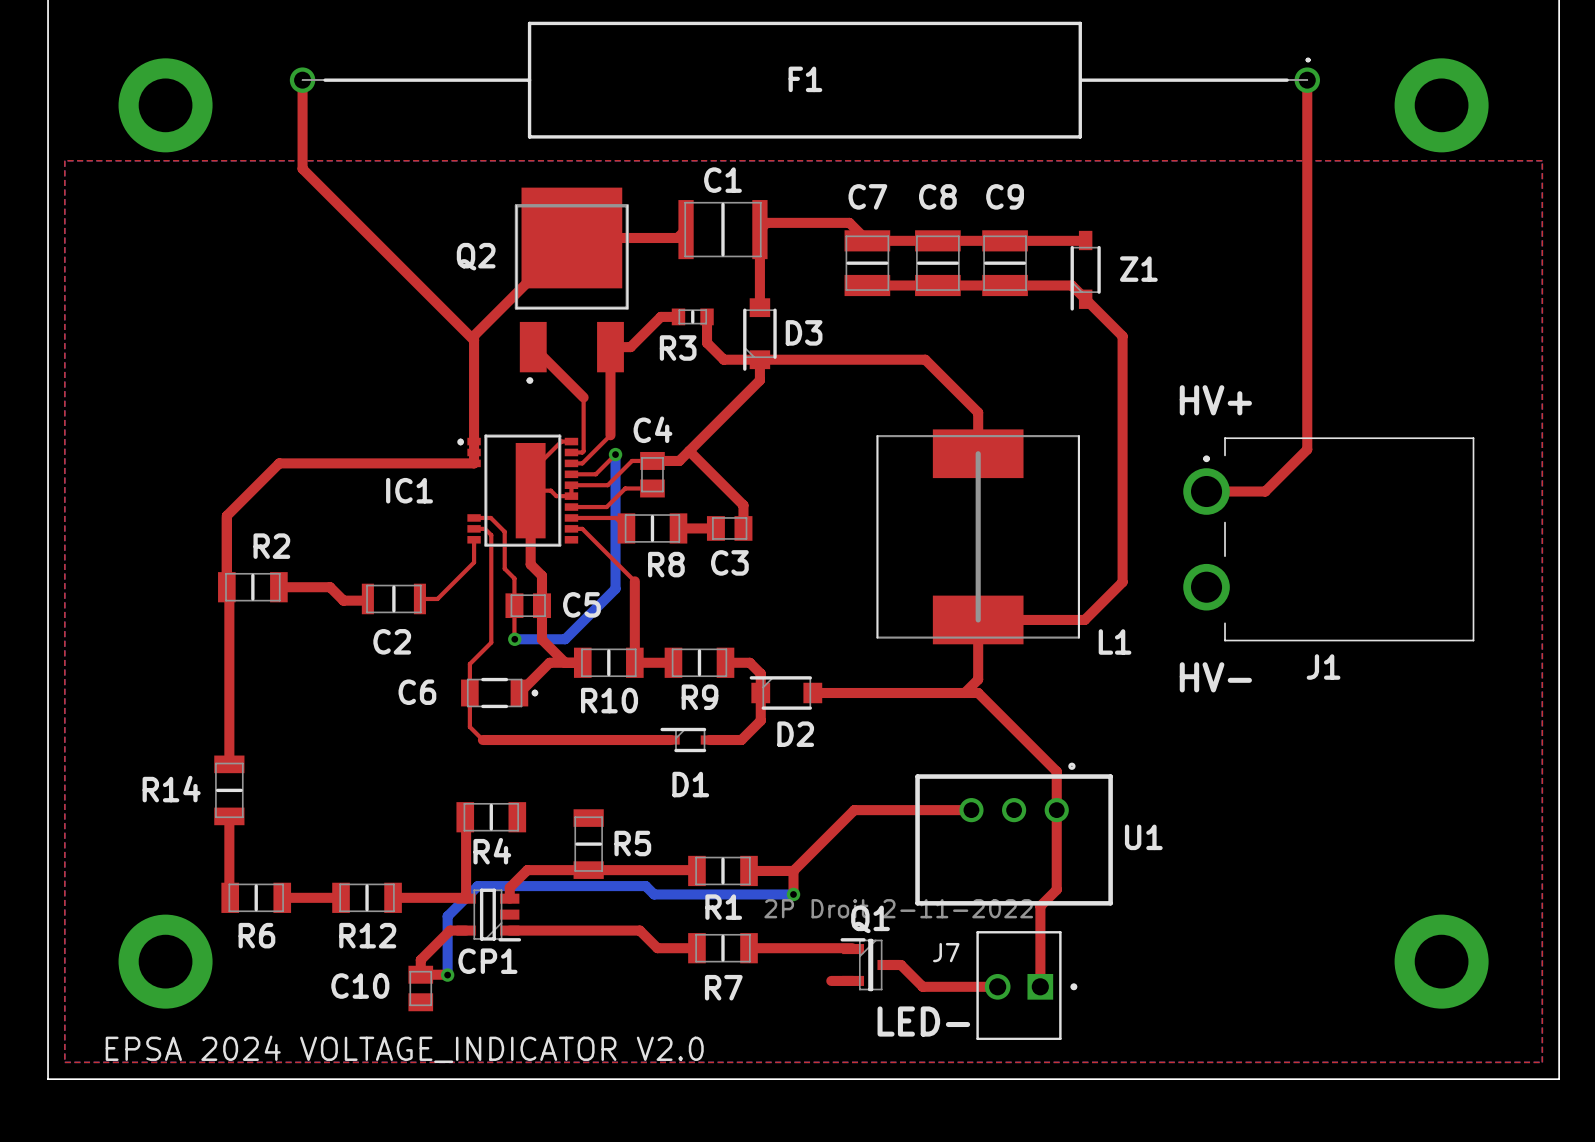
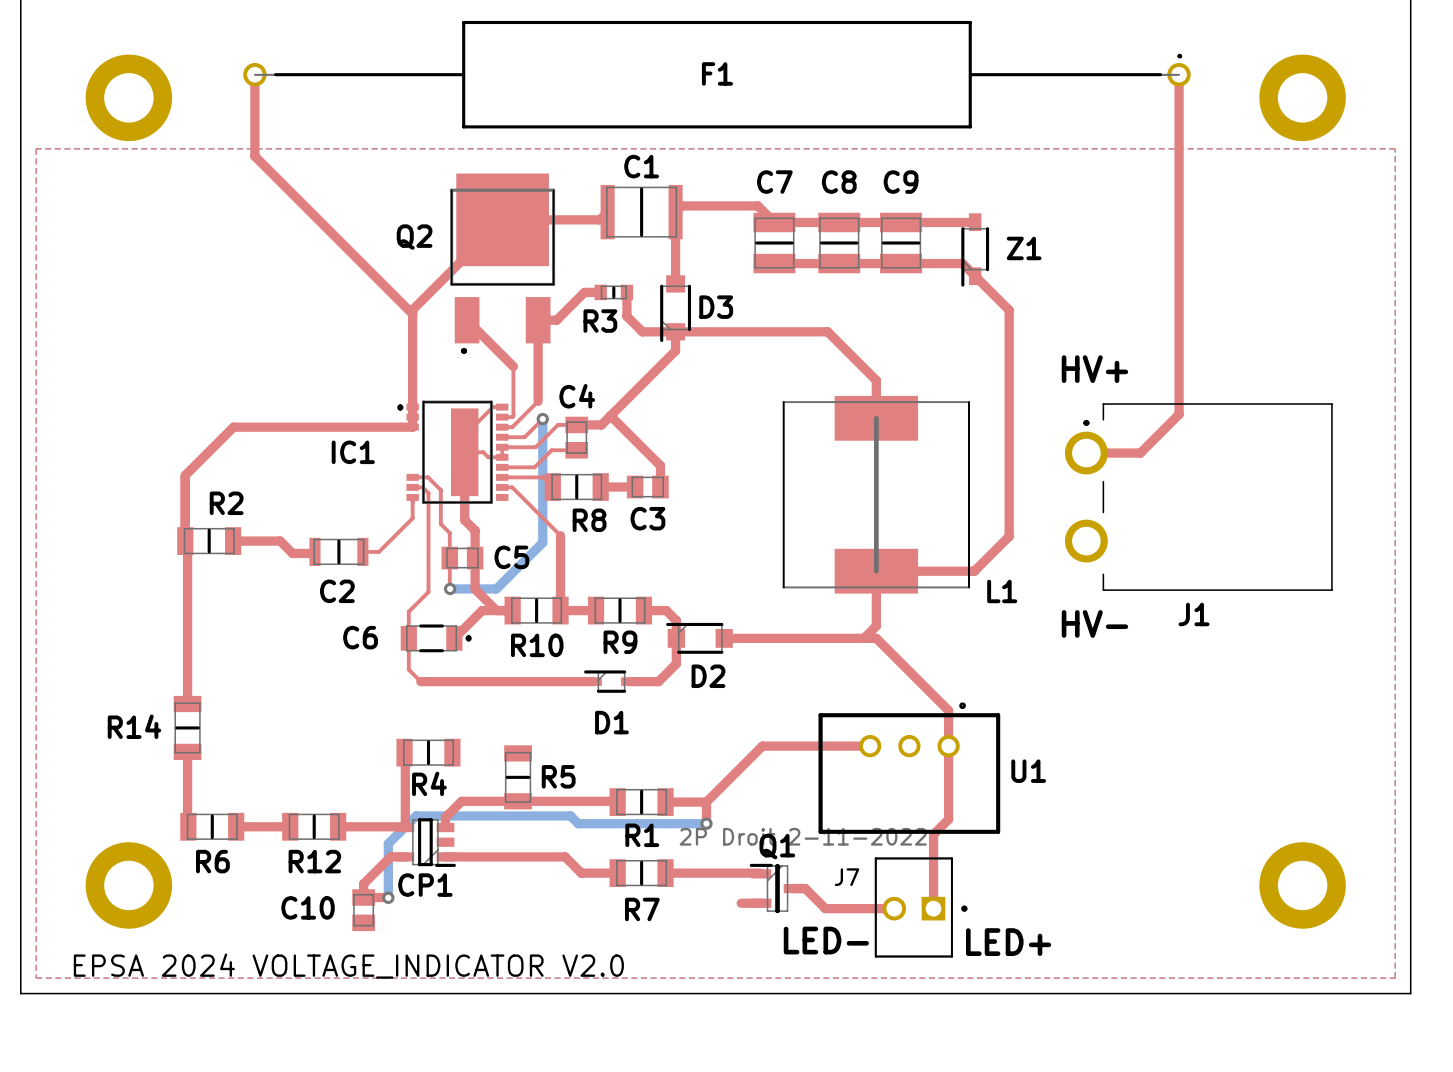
text: none -> LED+ (1008, 942)

